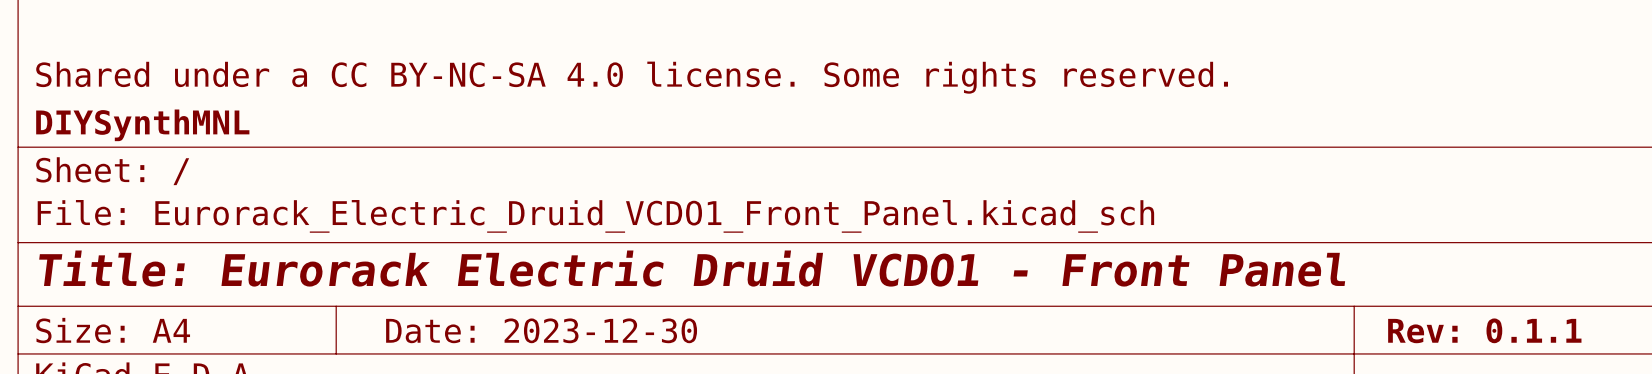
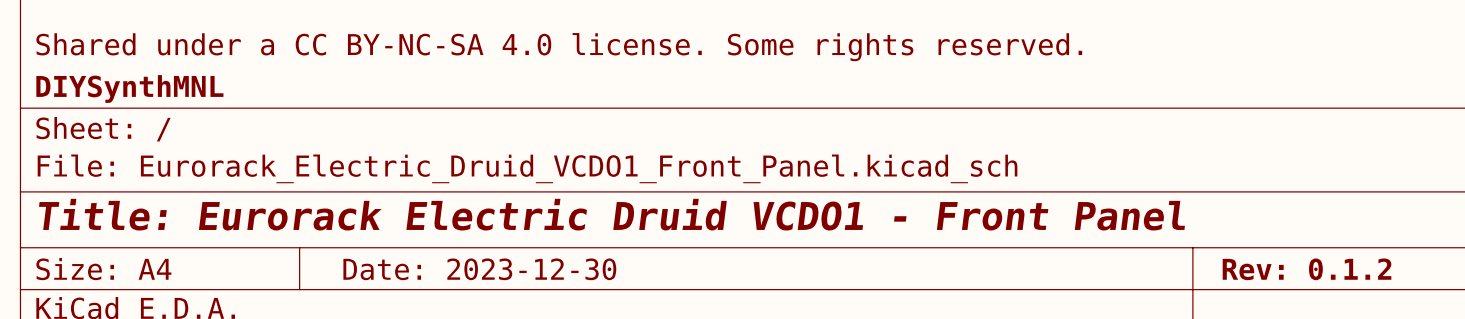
title block: Rev: 0.1.1 (1484, 330) -> Rev: 0.1.2 (1307, 269)

